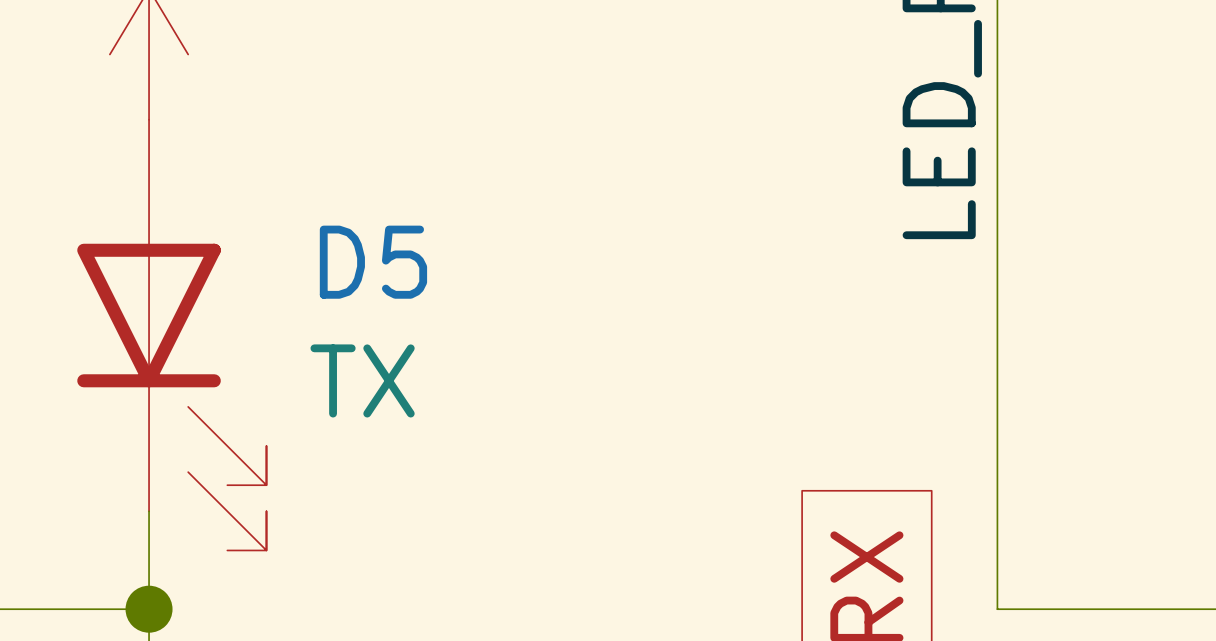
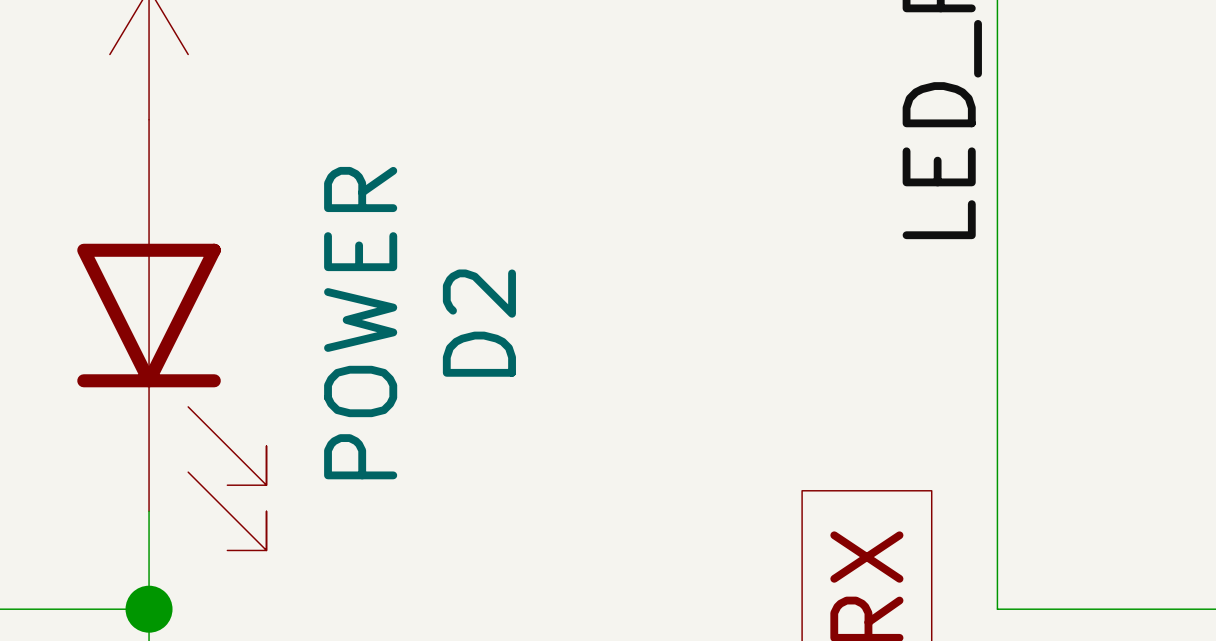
D5 name: D5 (373, 262) -> D2 (479, 323)
D5 value: TX (362, 380) -> POWER (360, 323)

